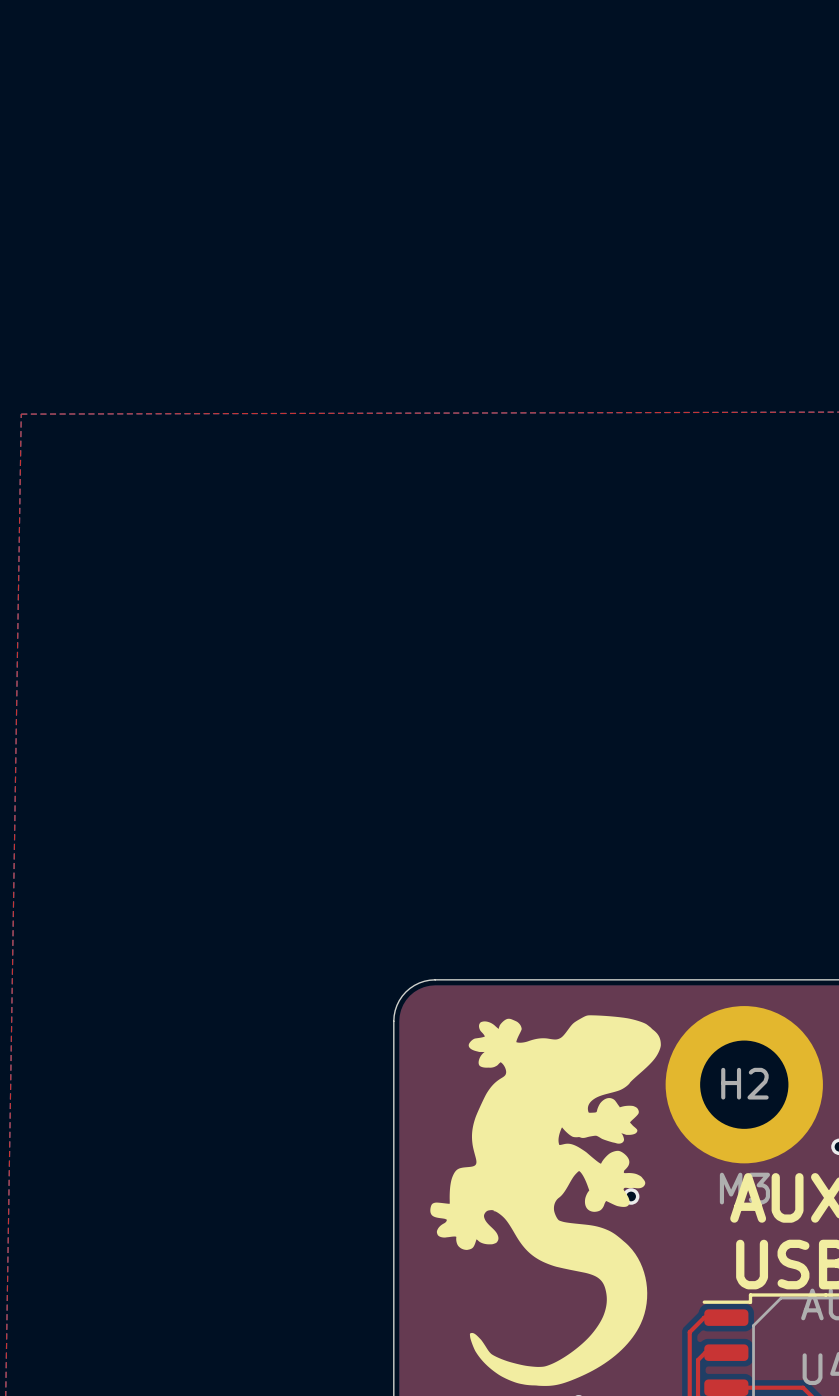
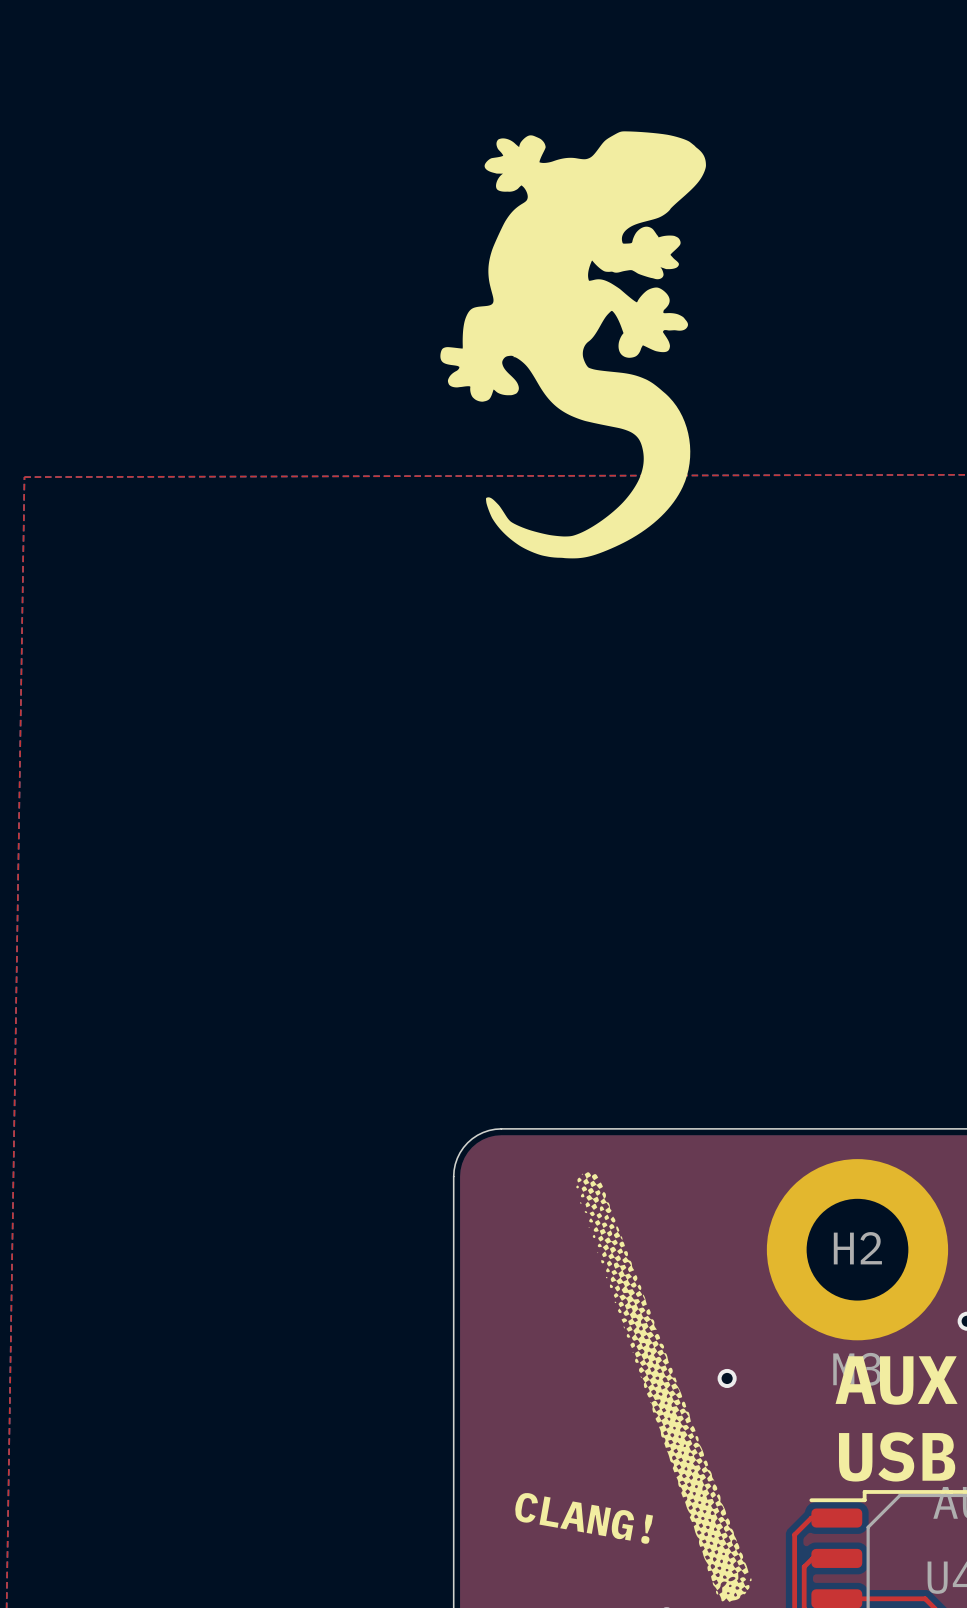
drawing: none -> [440, 131, 706, 559]
drawing: [430, 1015, 661, 1386] -> none
drawing: none -> [576, 1172, 752, 1602]
text: none -> CLANG! (583, 1518)

